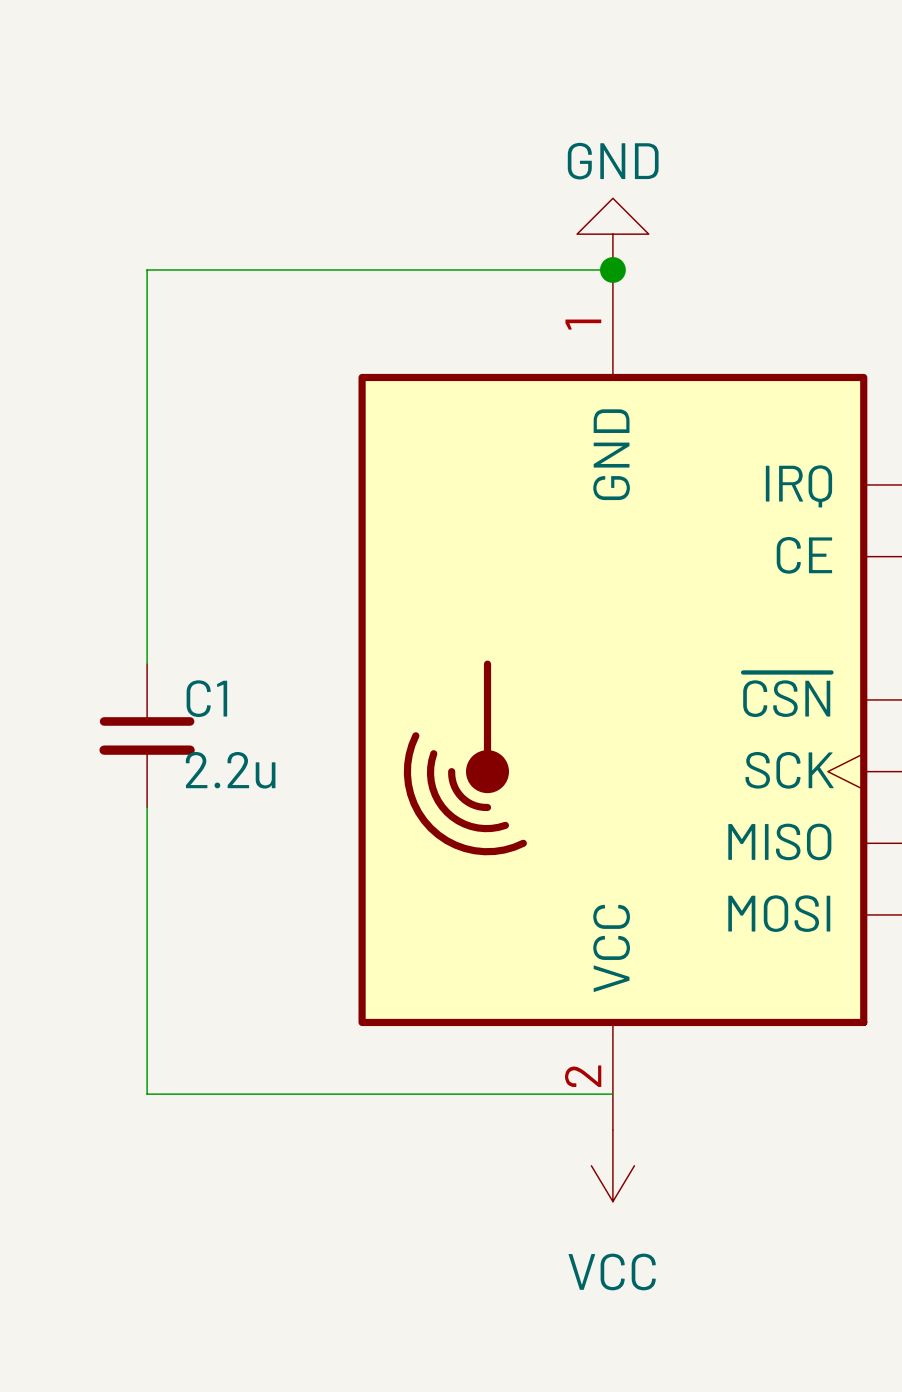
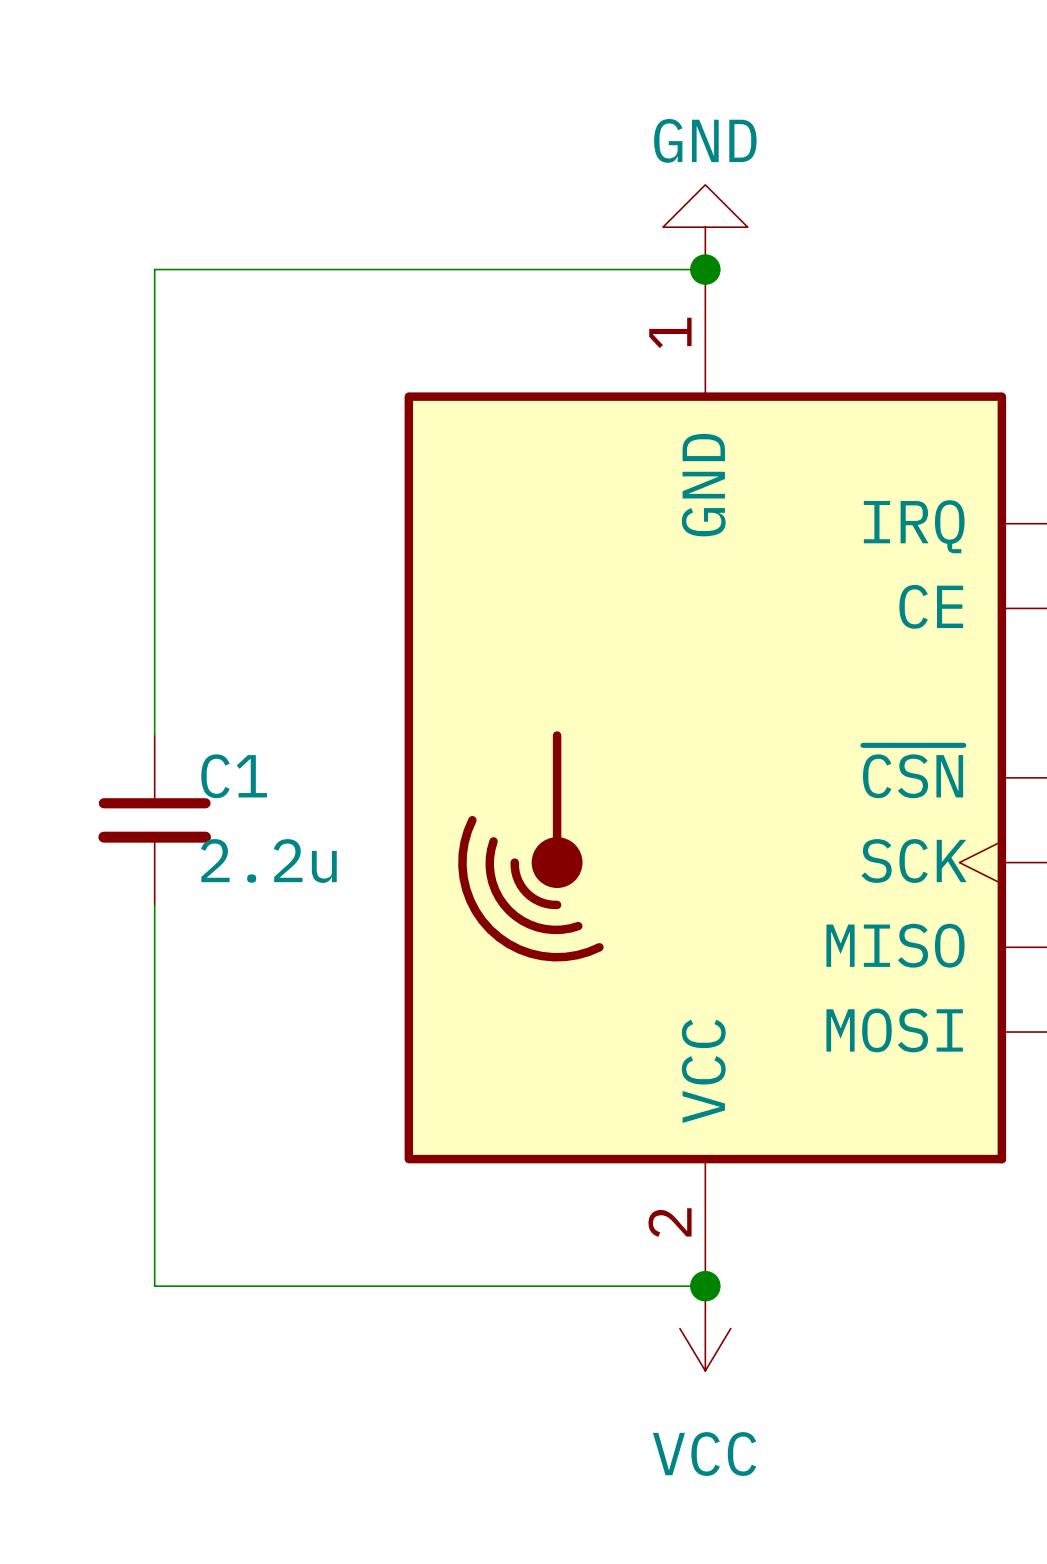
wire: (147, 1094) (612, 1094) -> (154, 1243) (154, 1286) (705, 1286)
junction: none -> (705, 1286)

